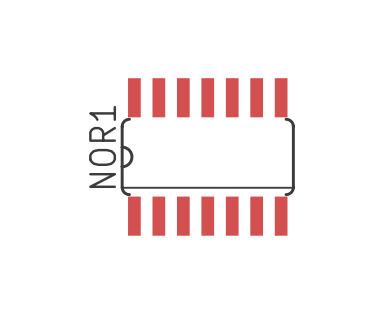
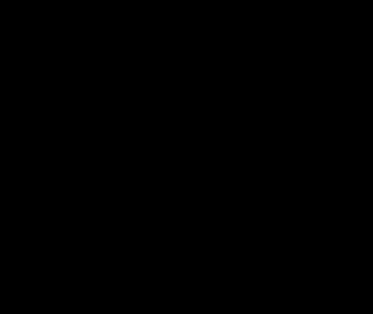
NOR1: (207, 156) -> none

